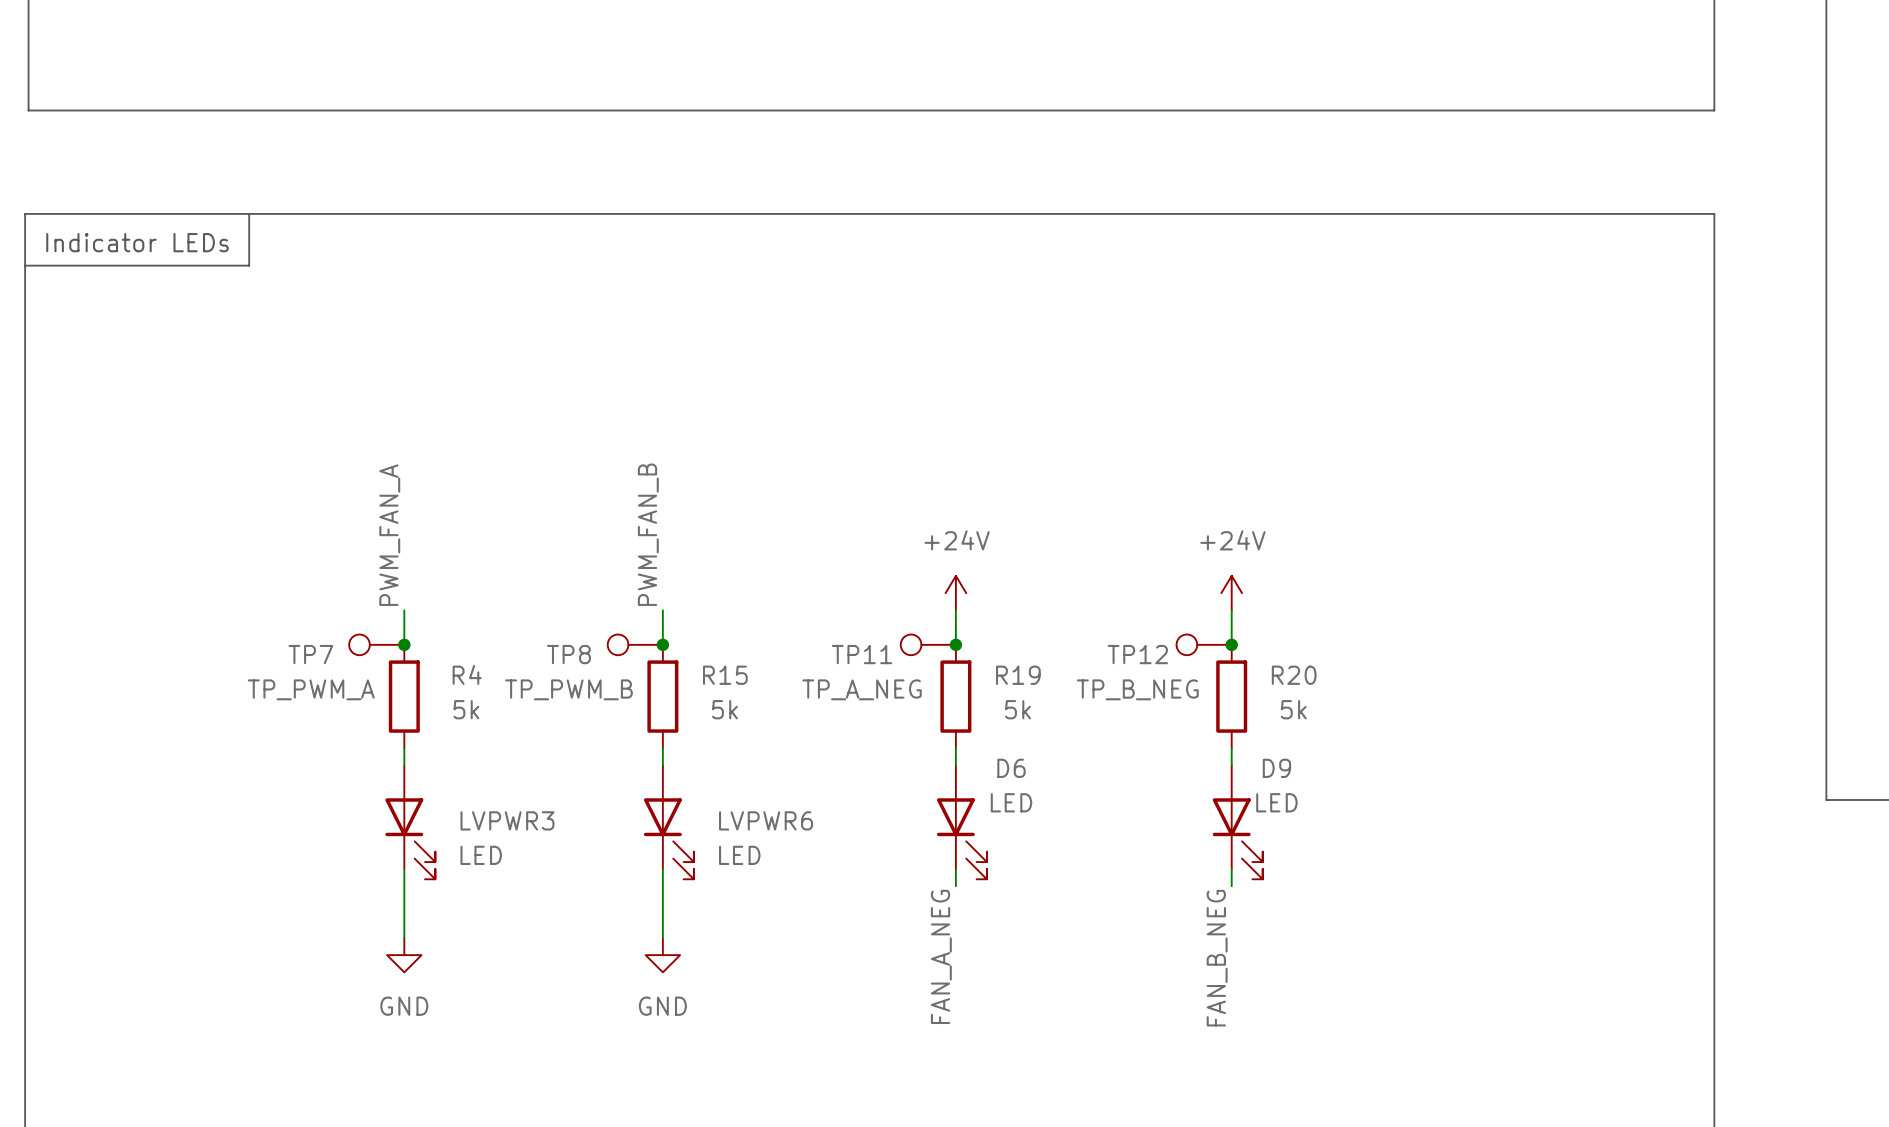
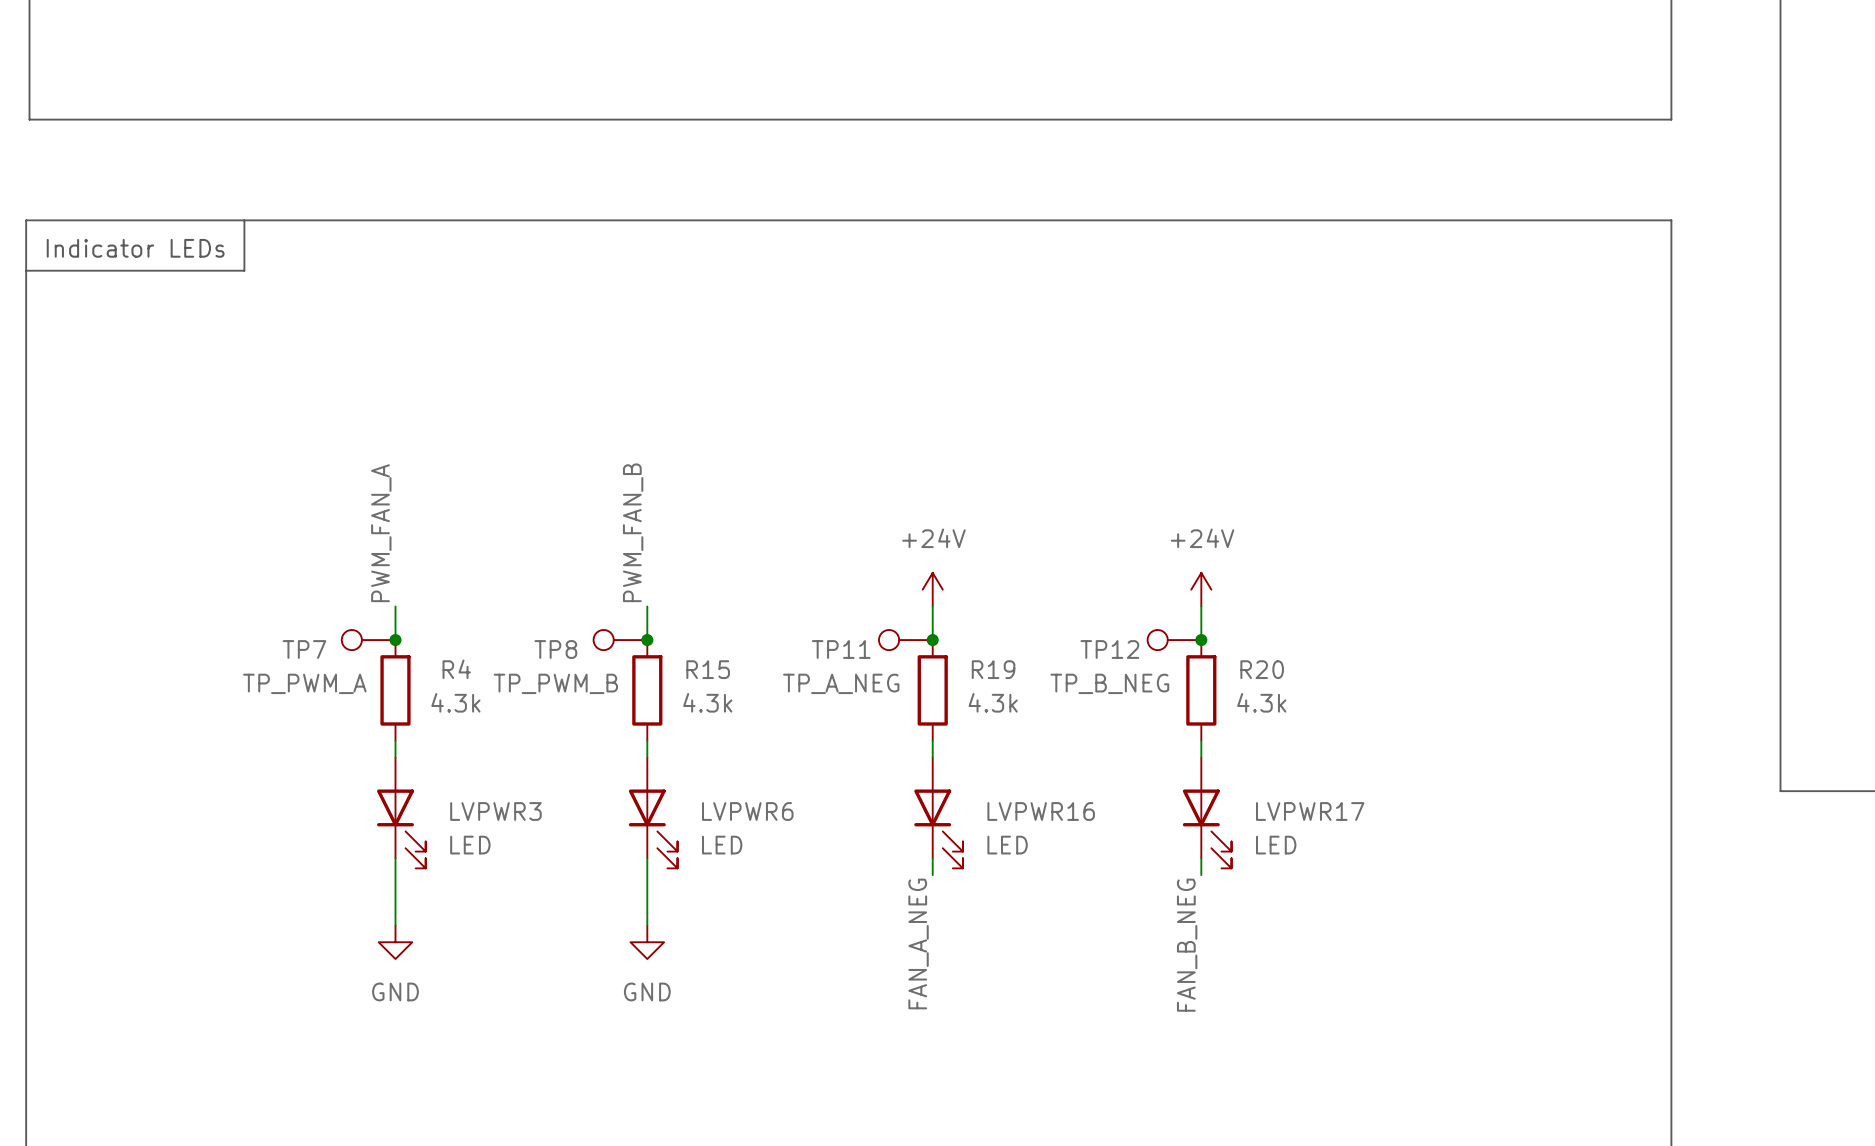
R4 value: 5k (466, 709) -> 4.3k (455, 702)
R15 value: 5k (724, 709) -> 4.3k (707, 702)
R19 value: 5k (1017, 709) -> 4.3k (993, 702)
R20 value: 5k (1293, 709) -> 4.3k (1261, 702)
D6 name: D6 (1011, 768) -> LVPWR16 (1041, 811)
D9 name: D9 (1276, 768) -> LVPWR17 (1310, 811)
D6 value position: LED (1011, 802) -> LED (1007, 845)
D9 value position: LED (1276, 802) -> LED (1276, 845)

